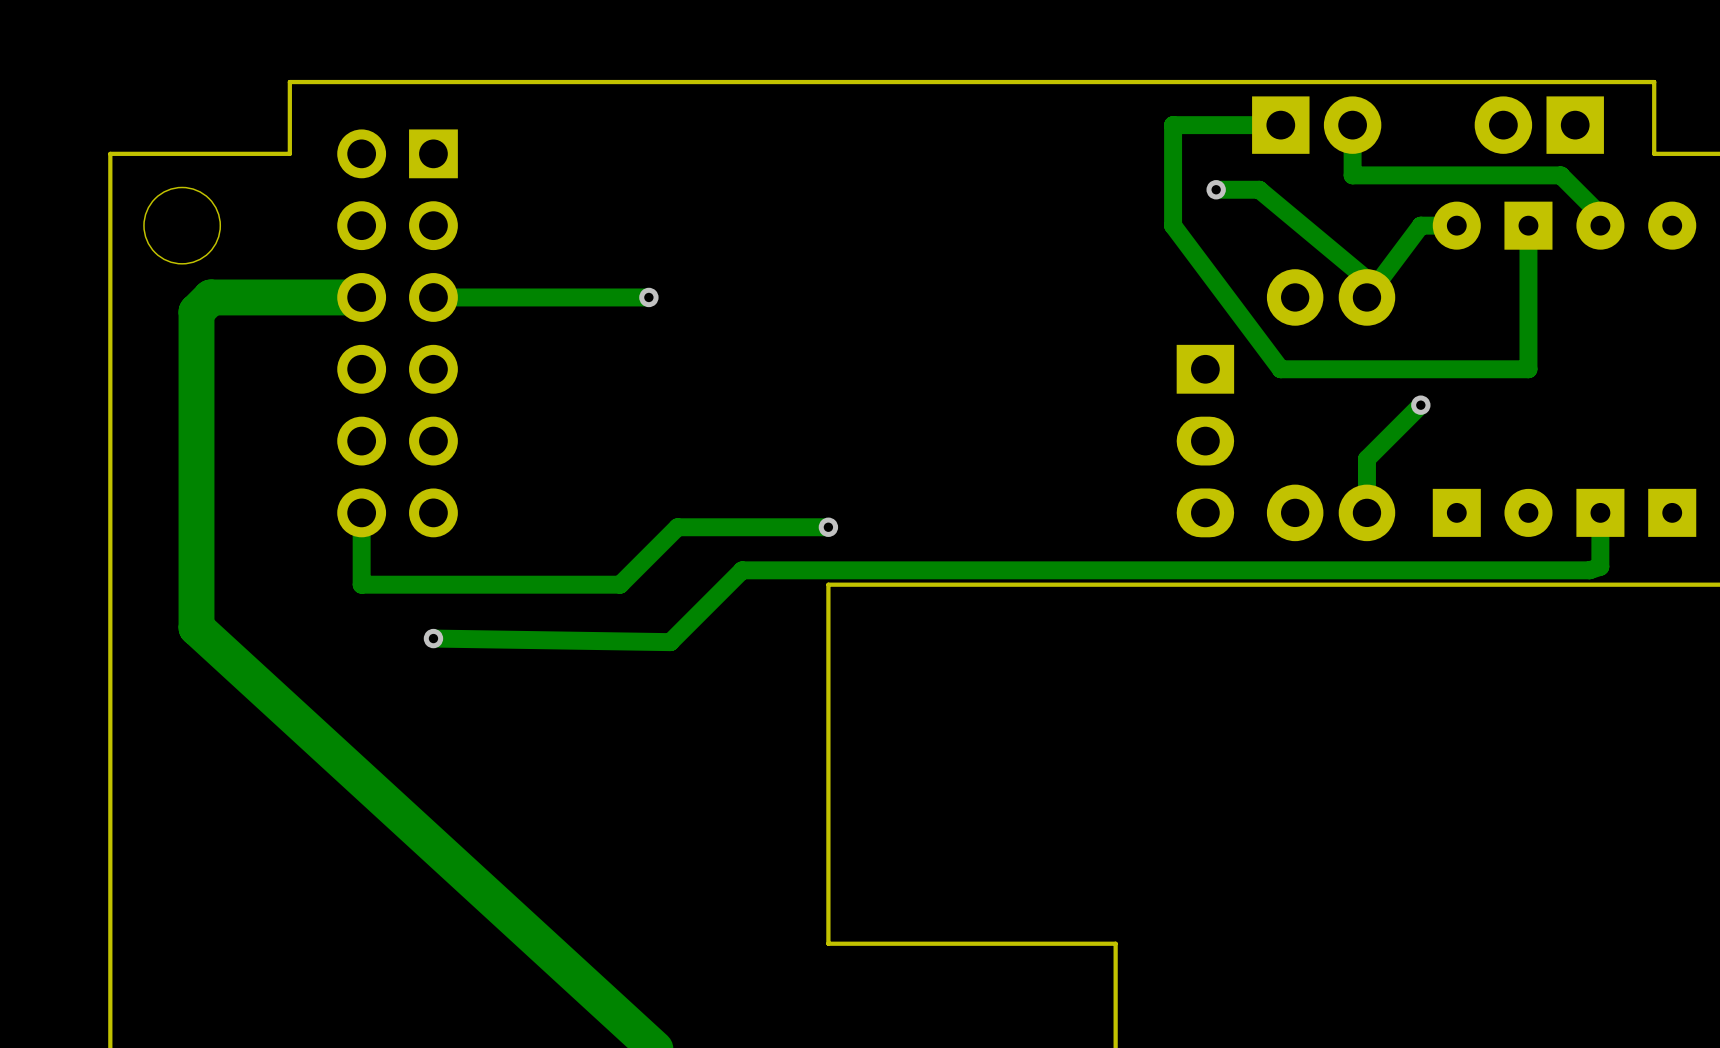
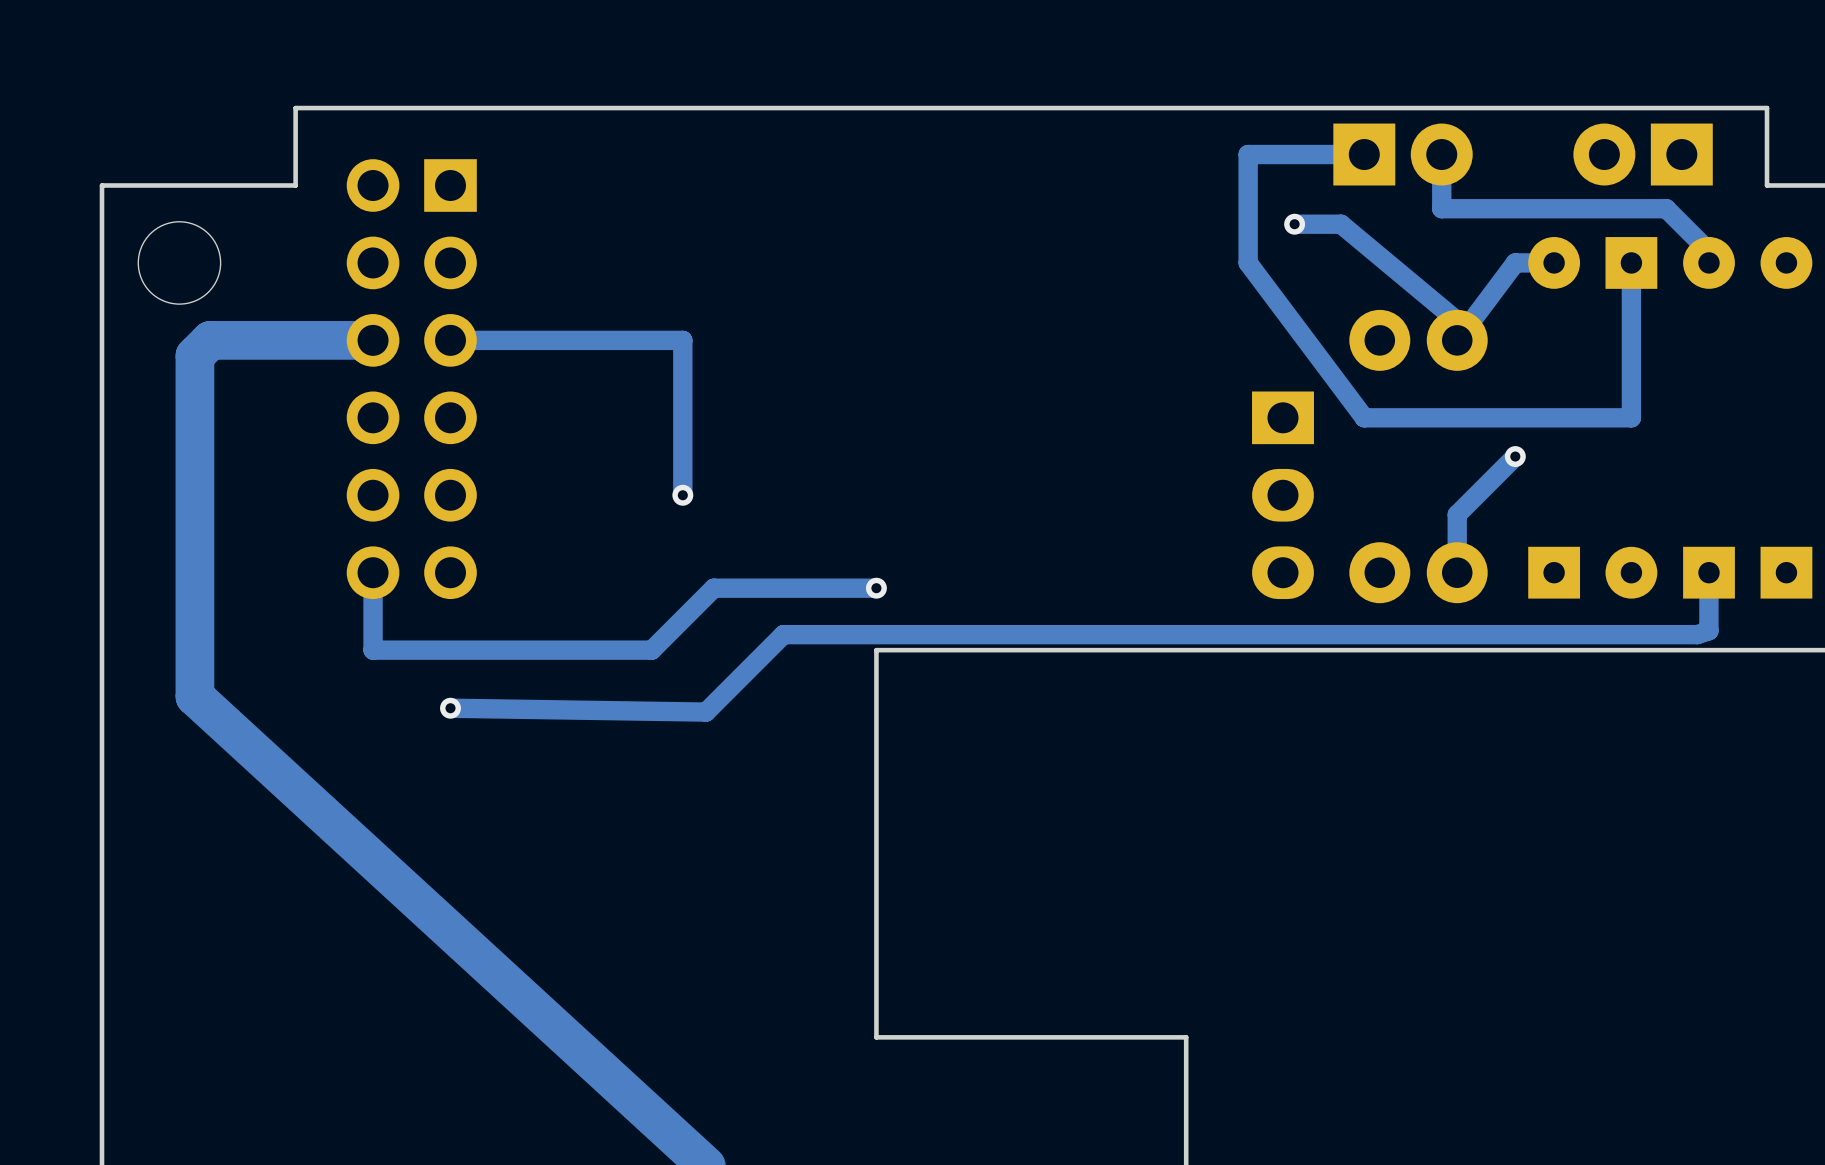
track: none -> (682, 340) (682, 495)
via position: (648, 297) -> (682, 495)

